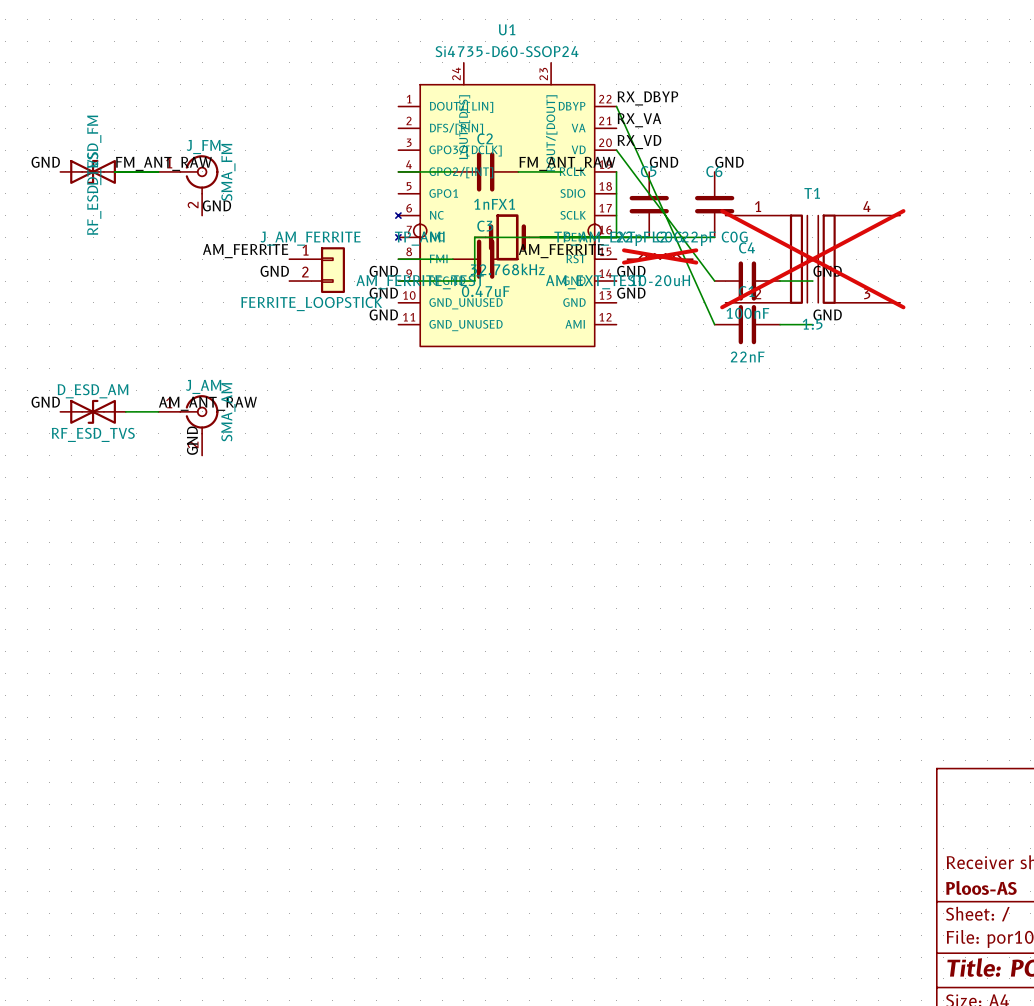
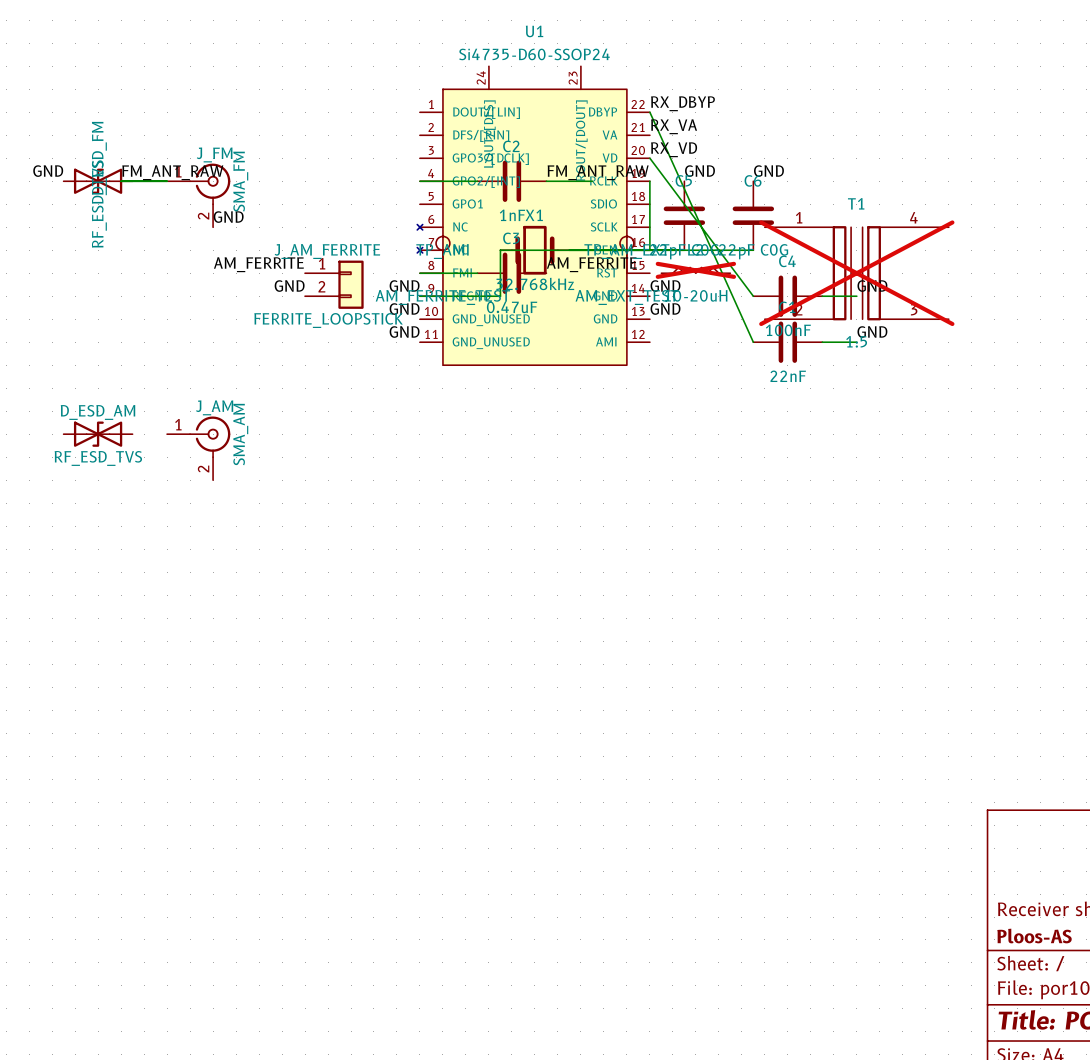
label: GND (45, 402) -> none
label: AM_ANT_RAW (207, 403) -> none
wire: (125, 411) (158, 411) -> none
label: GND (192, 440) -> none

